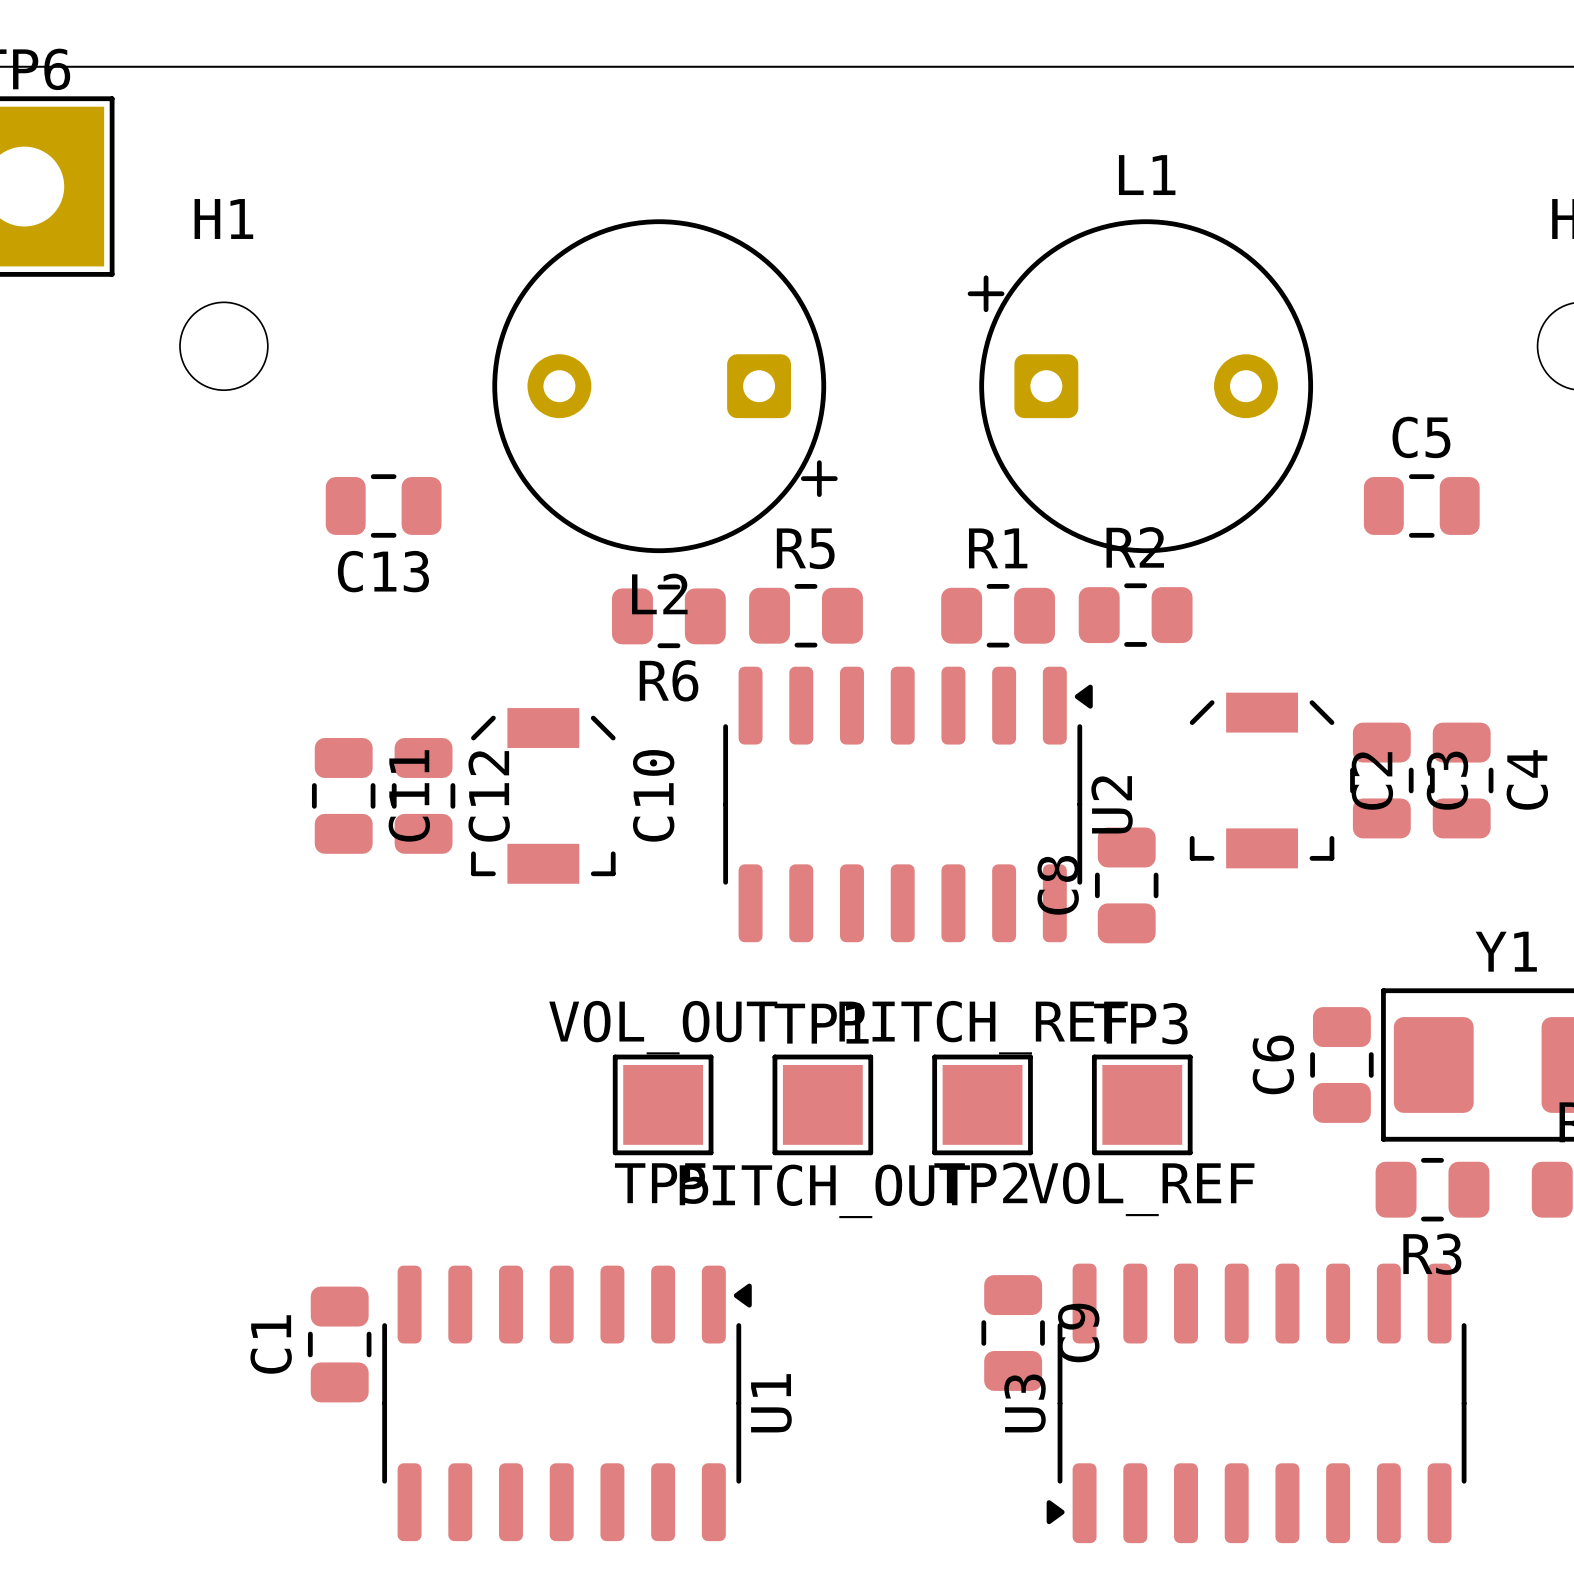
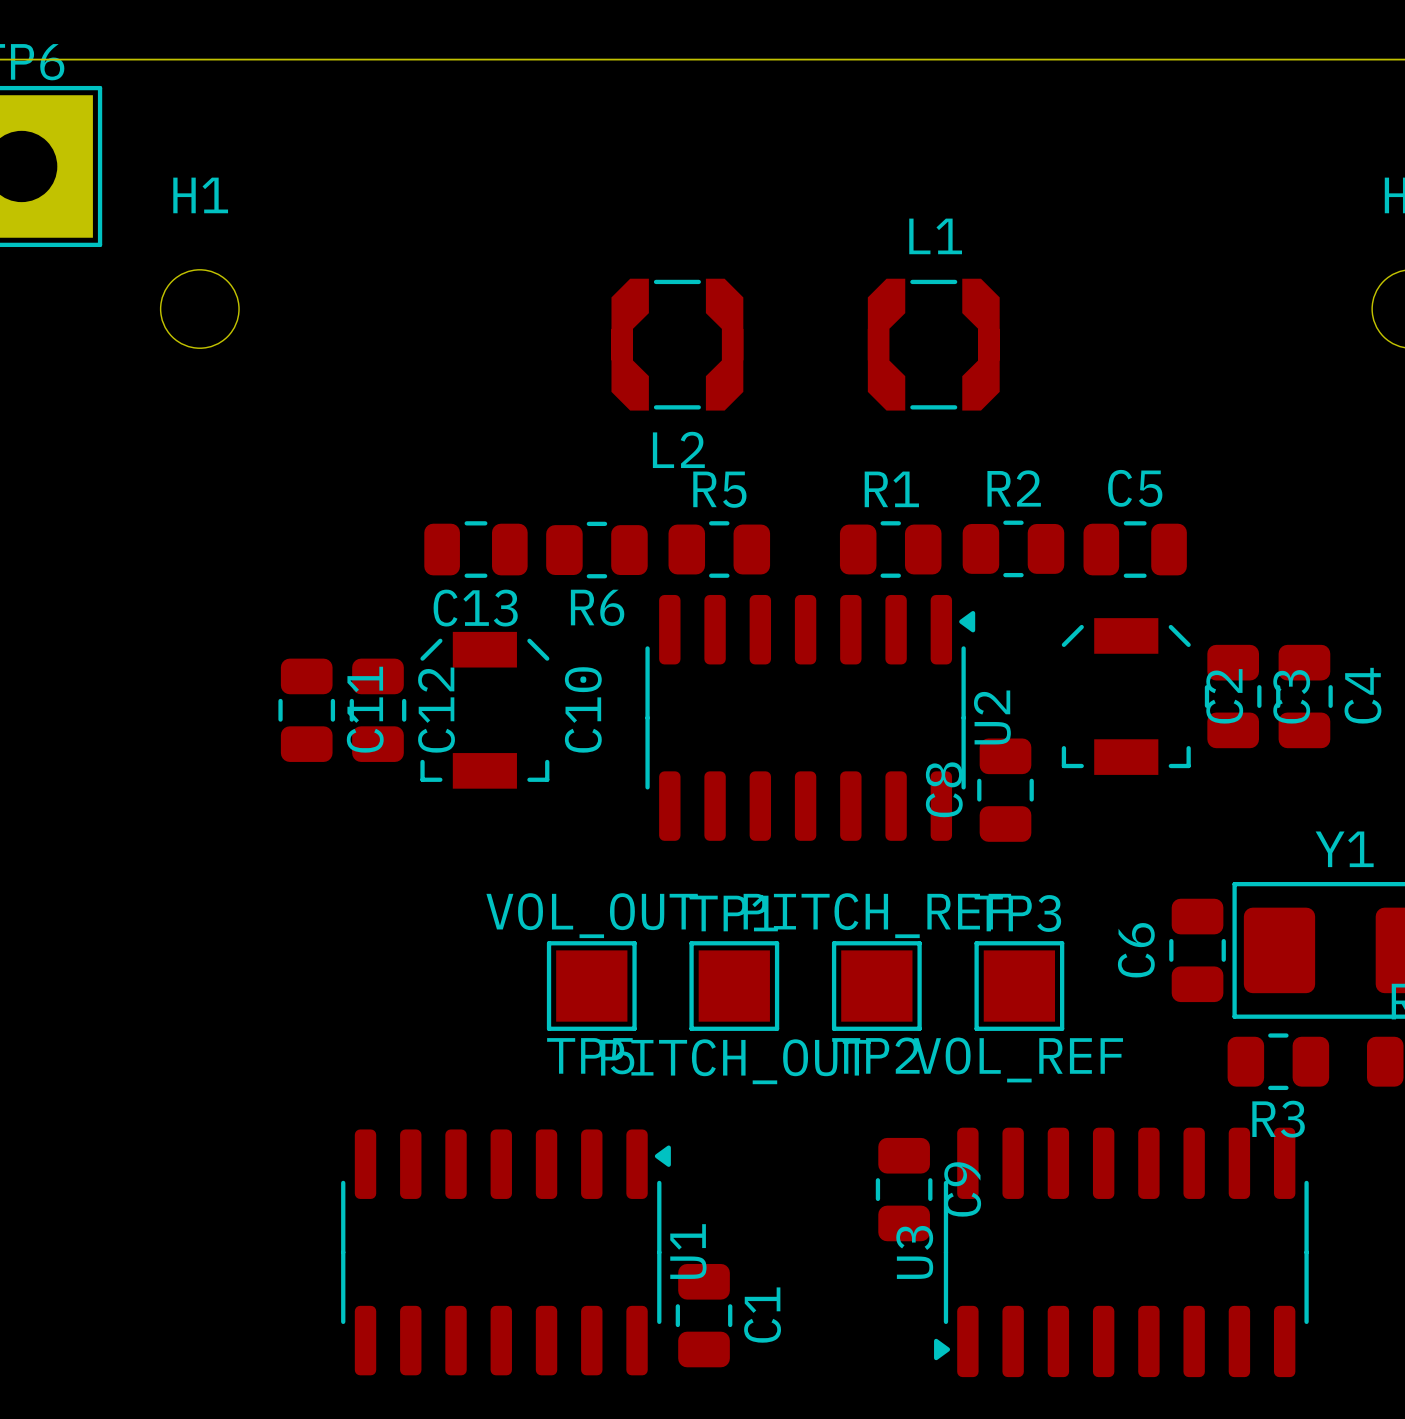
L1 name position: L1 (1147, 175) -> L1 (935, 236)
L2 footprint: [492, 219, 838, 554] -> [611, 278, 744, 411]
L1 footprint: [967, 219, 1314, 554] -> [867, 278, 1000, 411]
C13 position: (383, 505) -> (475, 549)
C5 position: (1421, 505) -> (1135, 549)
L2 name position: L2 (659, 593) -> L2 (678, 449)
C1 name position: C1 (271, 1344) -> C1 (762, 1315)
C1 position: (339, 1344) -> (704, 1315)

